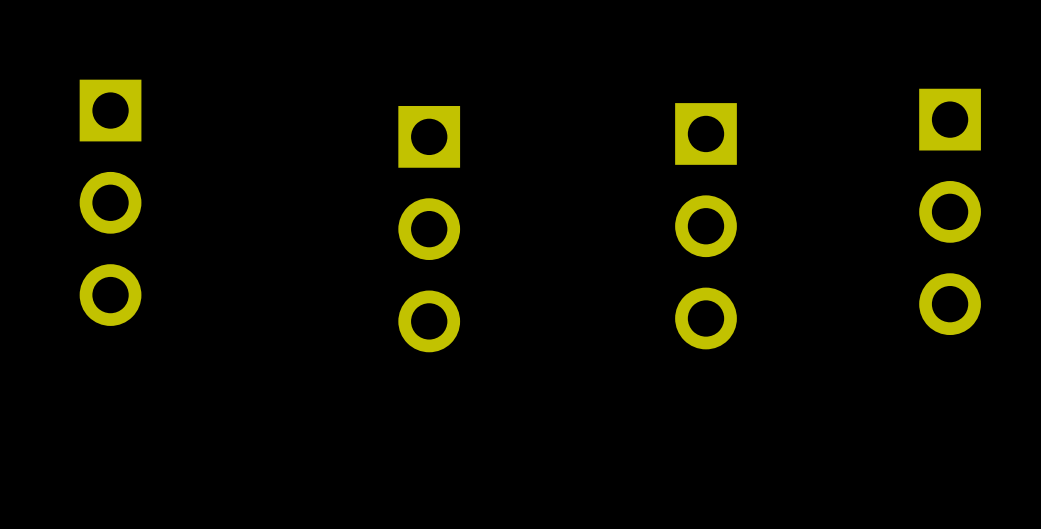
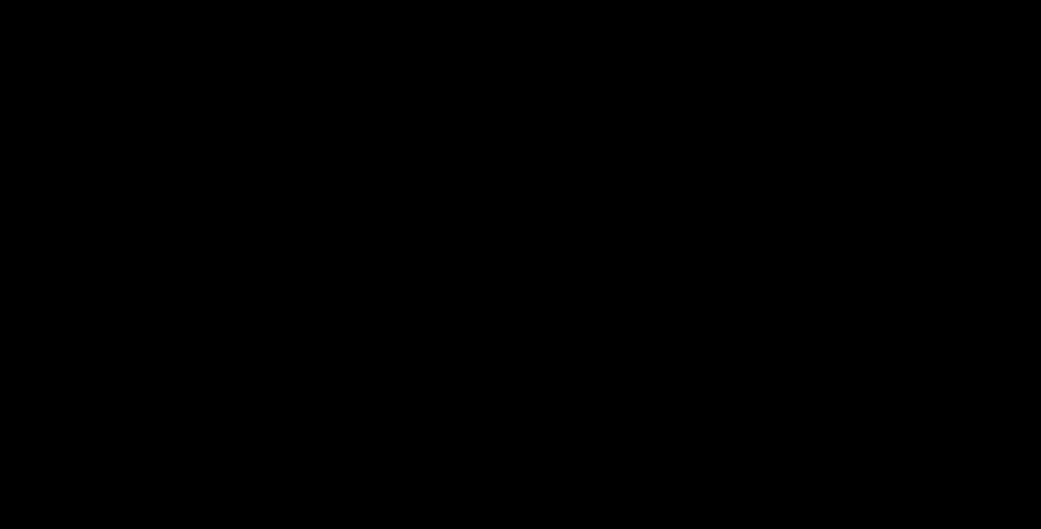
part: (110, 202) -> none
part: (950, 211) -> none
part: (706, 226) -> none
part: (429, 229) -> none

